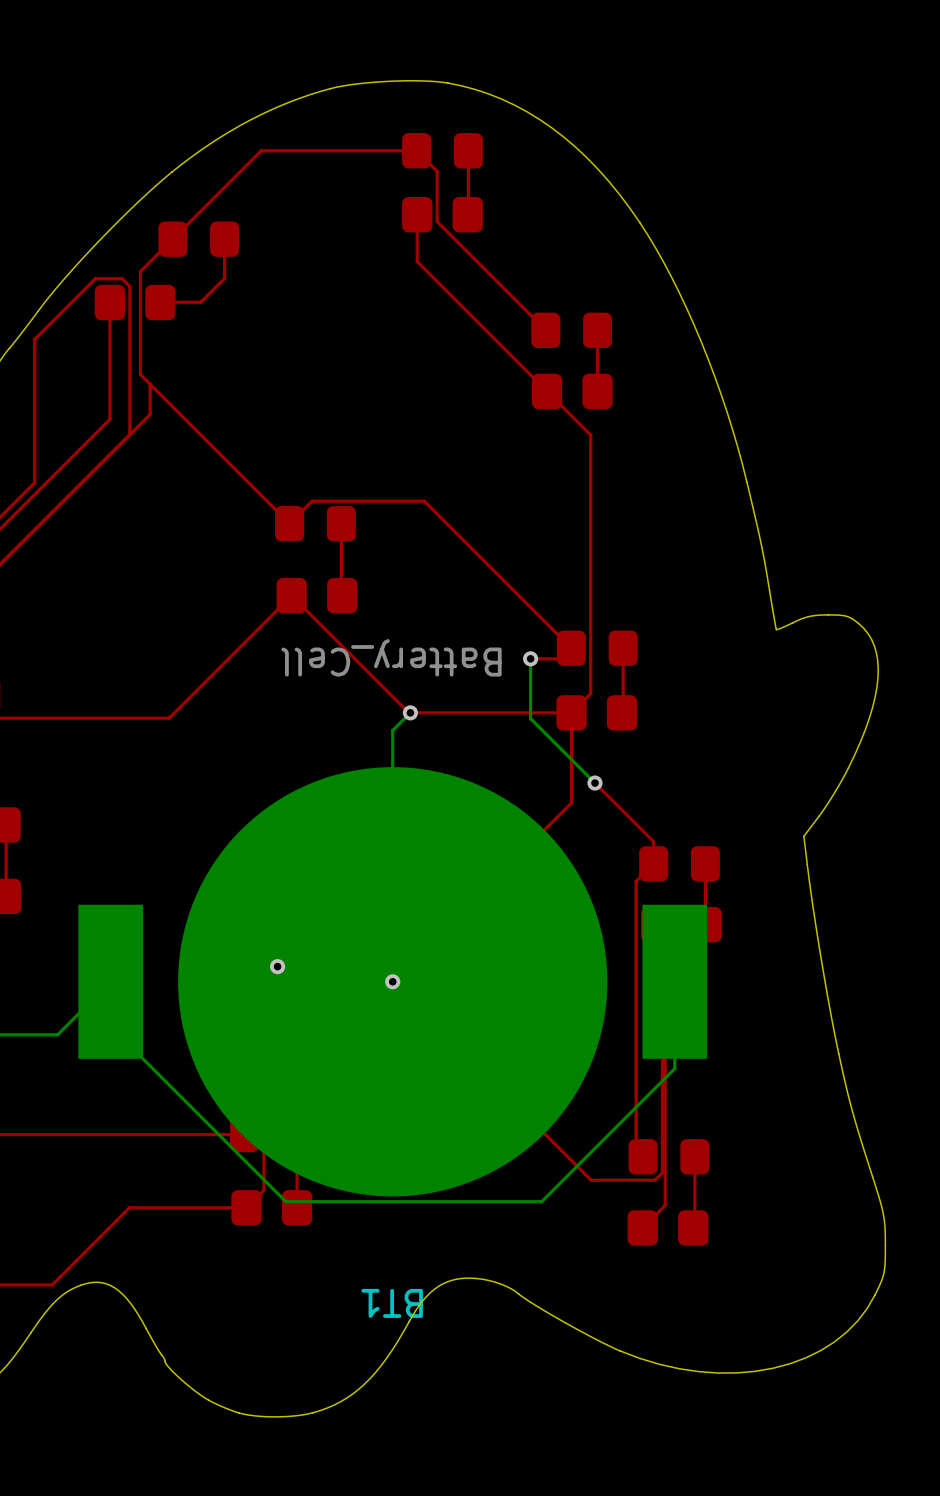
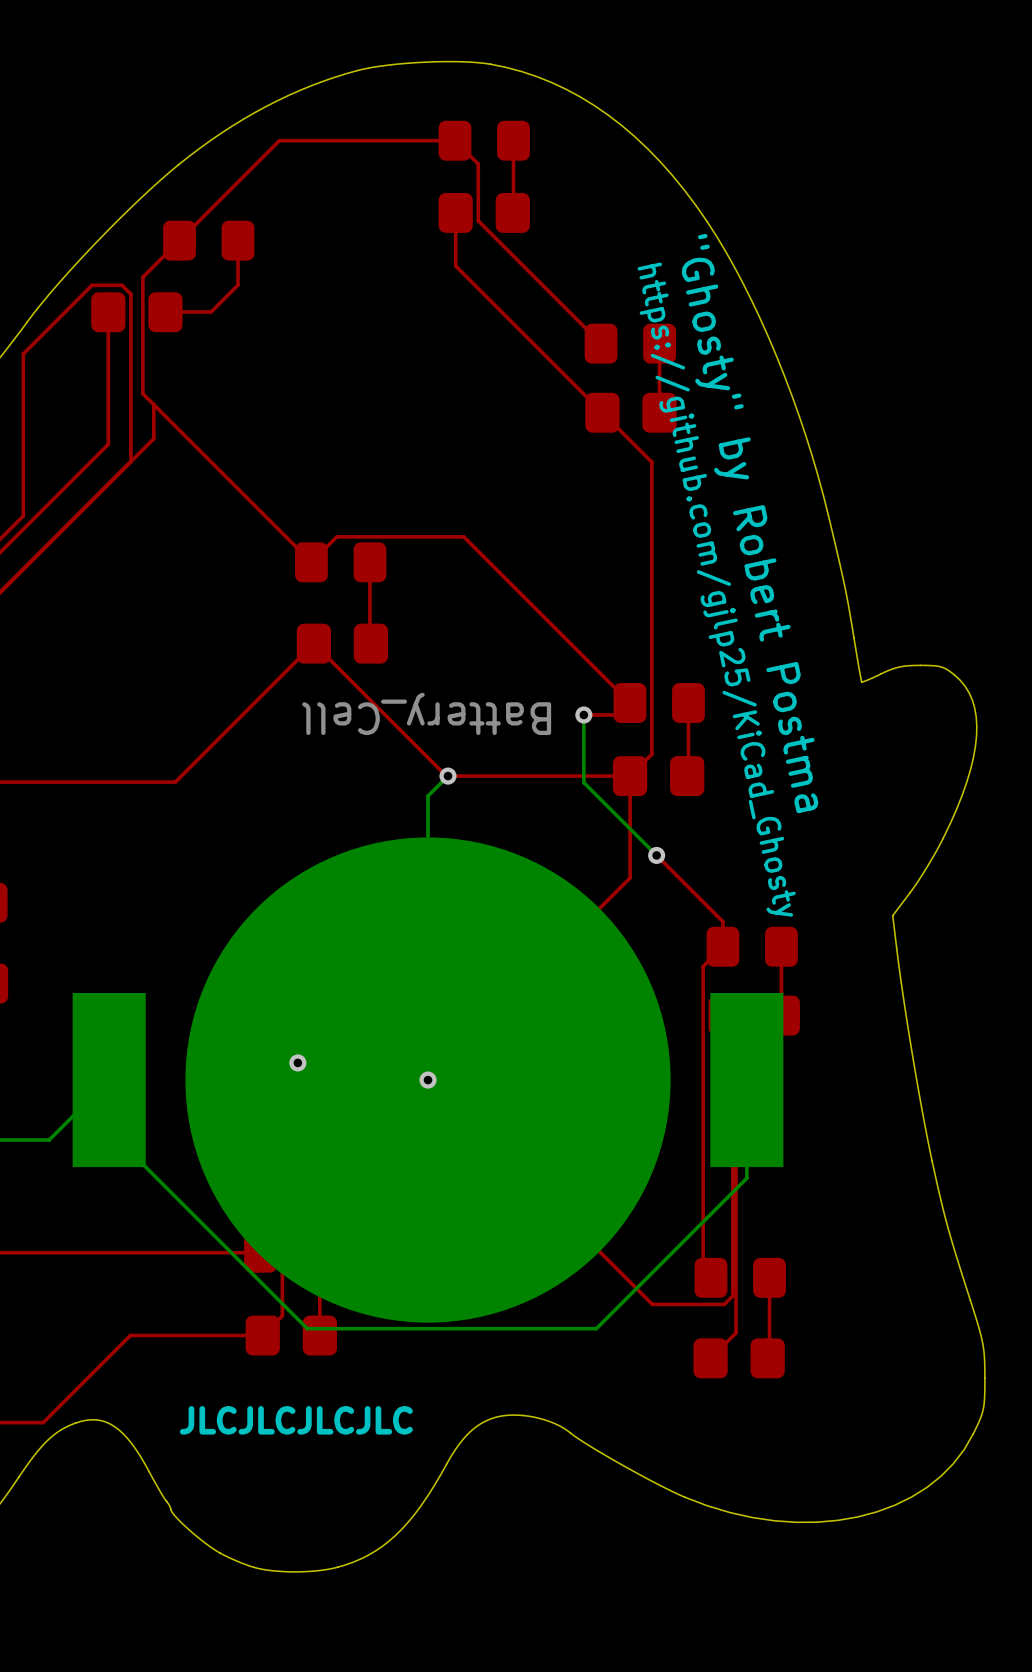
text: none -> "Ghosty" by Robert Postma (750, 523)
text: none -> https://github.com/gjlp25/KiCad_Ghosty (716, 589)
text: none -> JLCJLCJLCJLC (296, 1420)
BT1 name: BT1 (392, 1303) -> none

